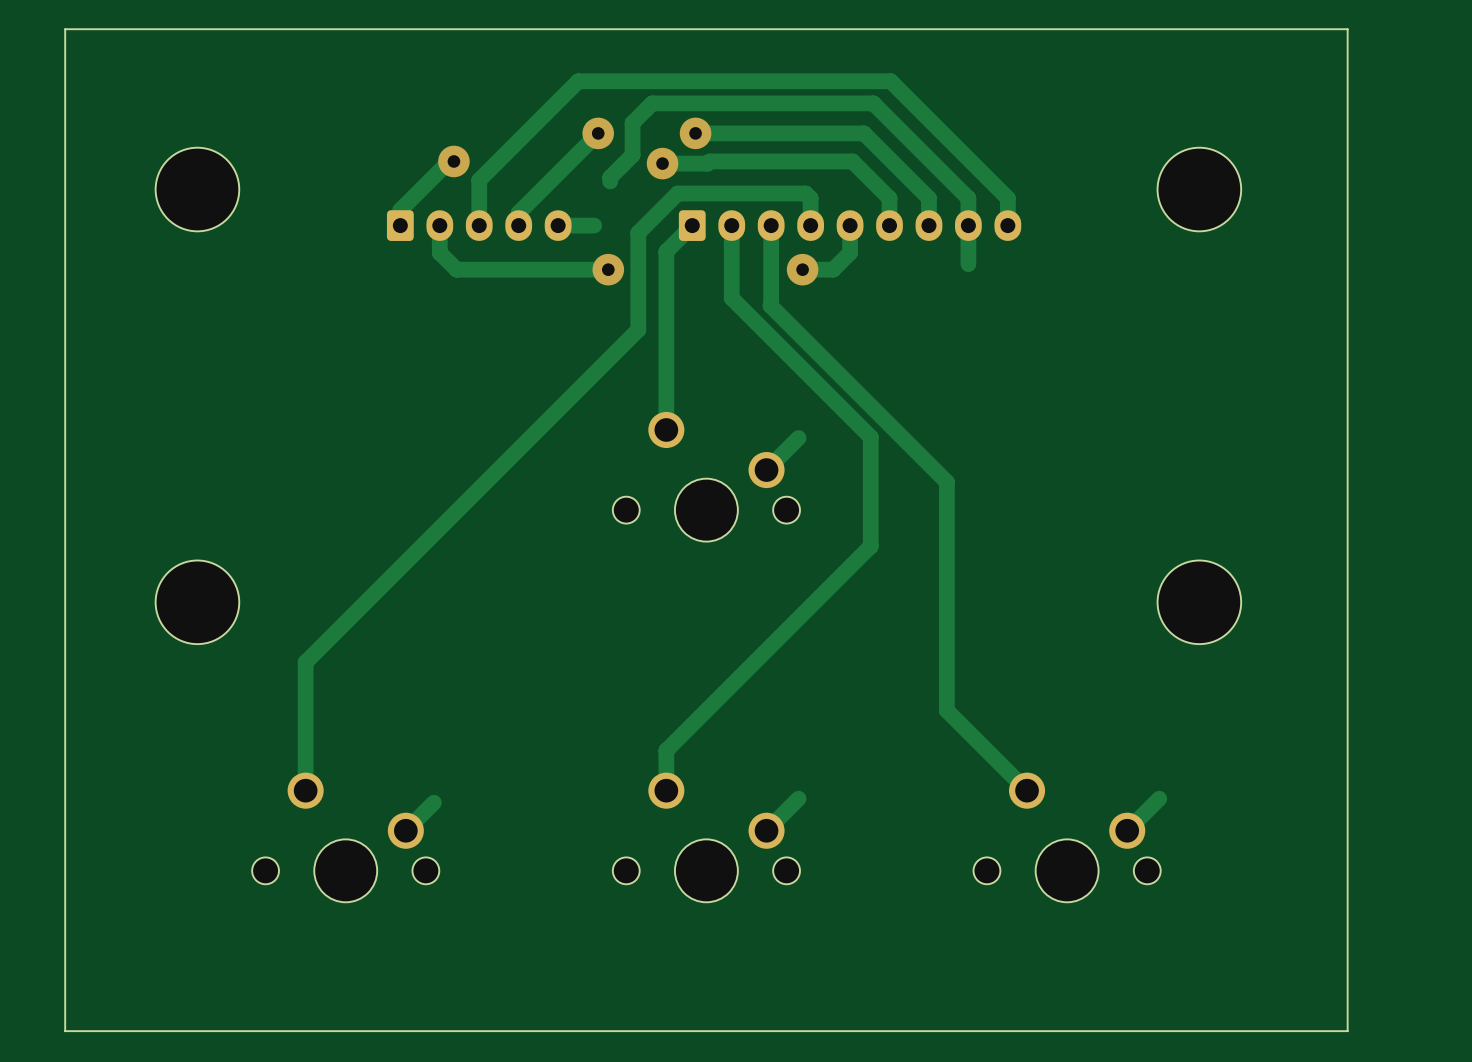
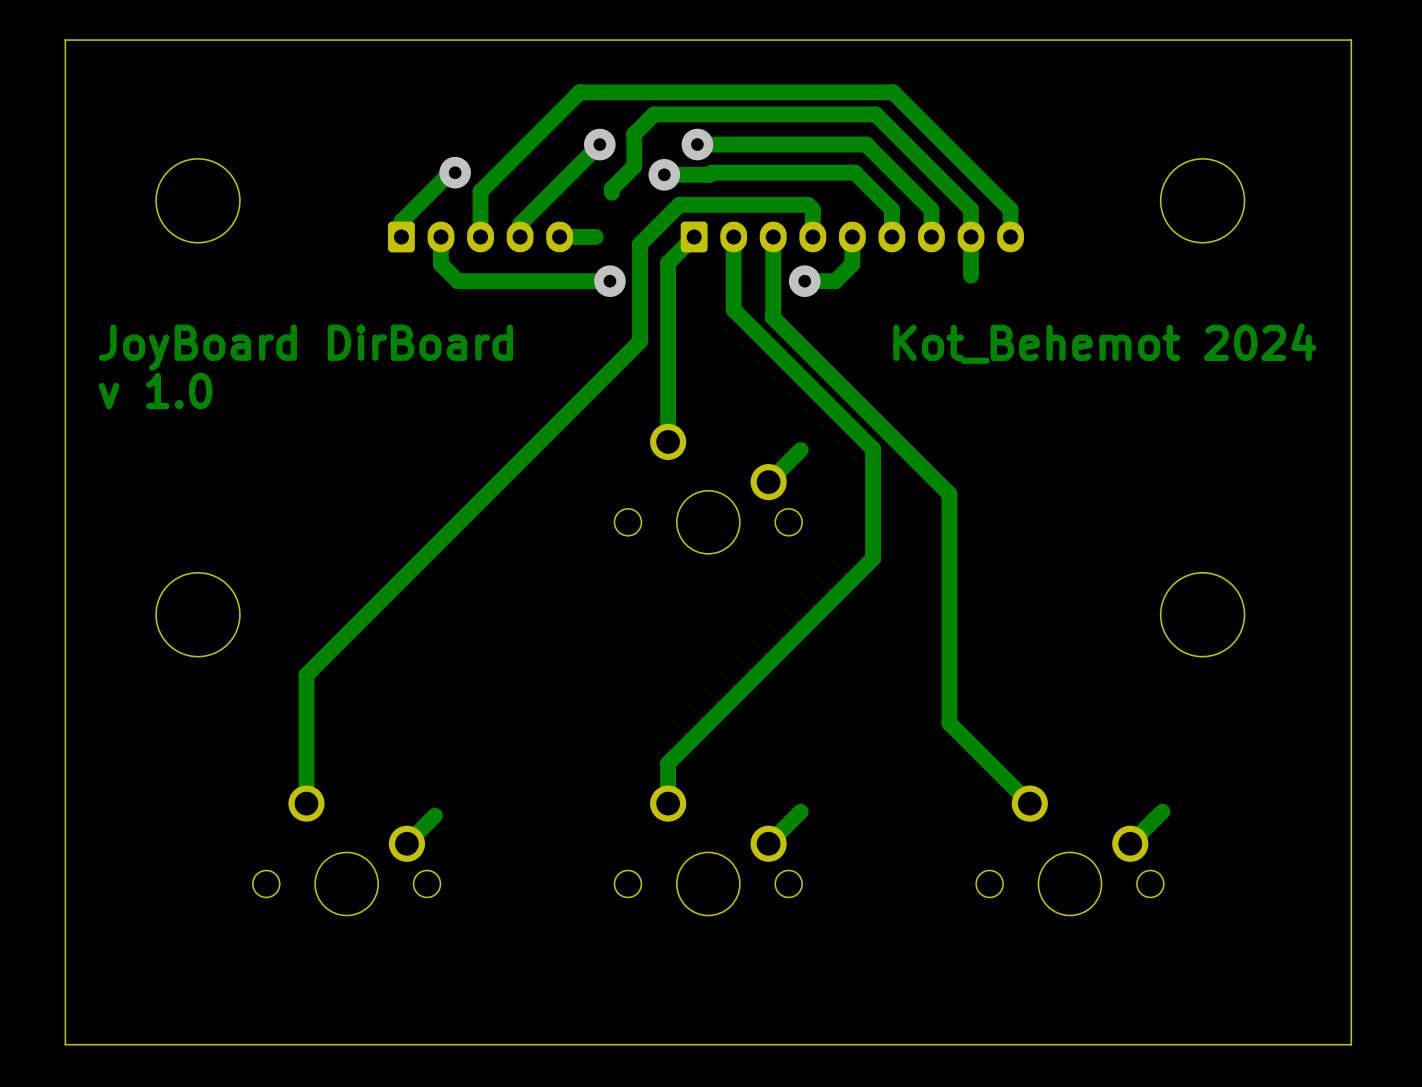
text: none -> Kot_Behemot 2024 (1104, 343)
text: none -> JoyBoard DirBoard (305, 347)
text: none -> v 1.0 (155, 391)

